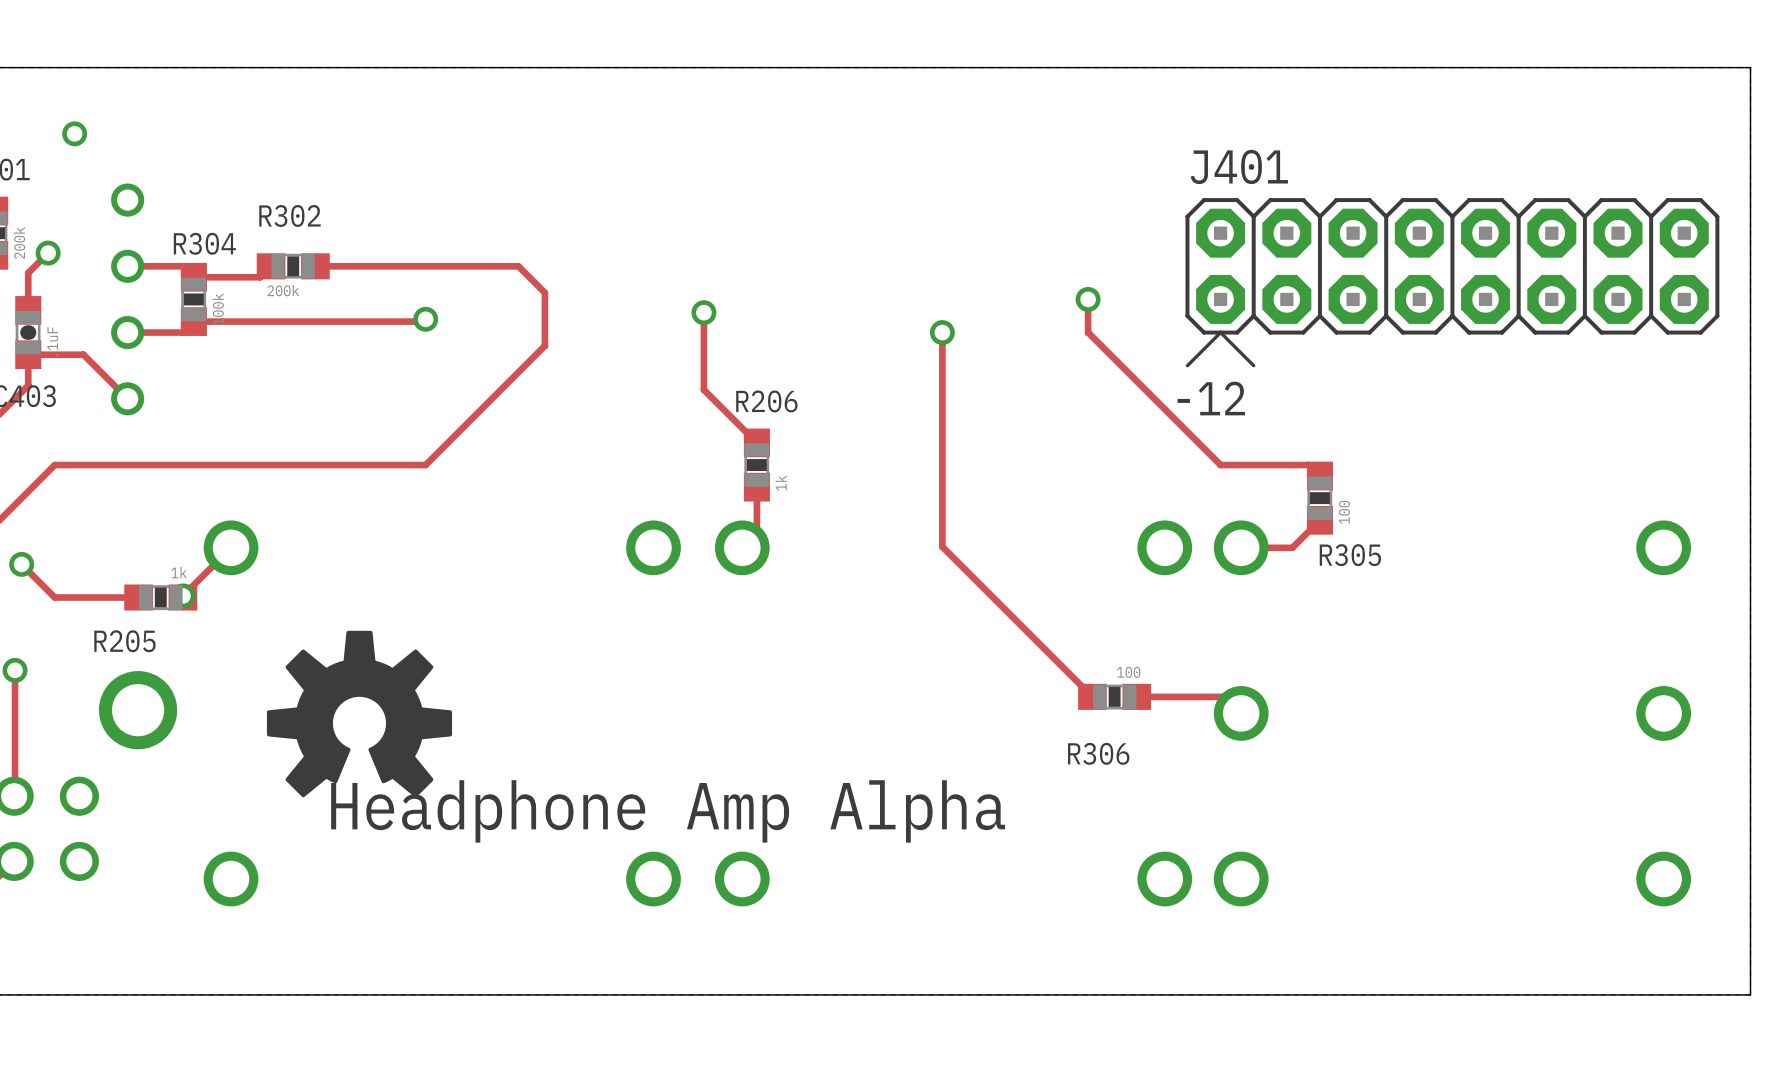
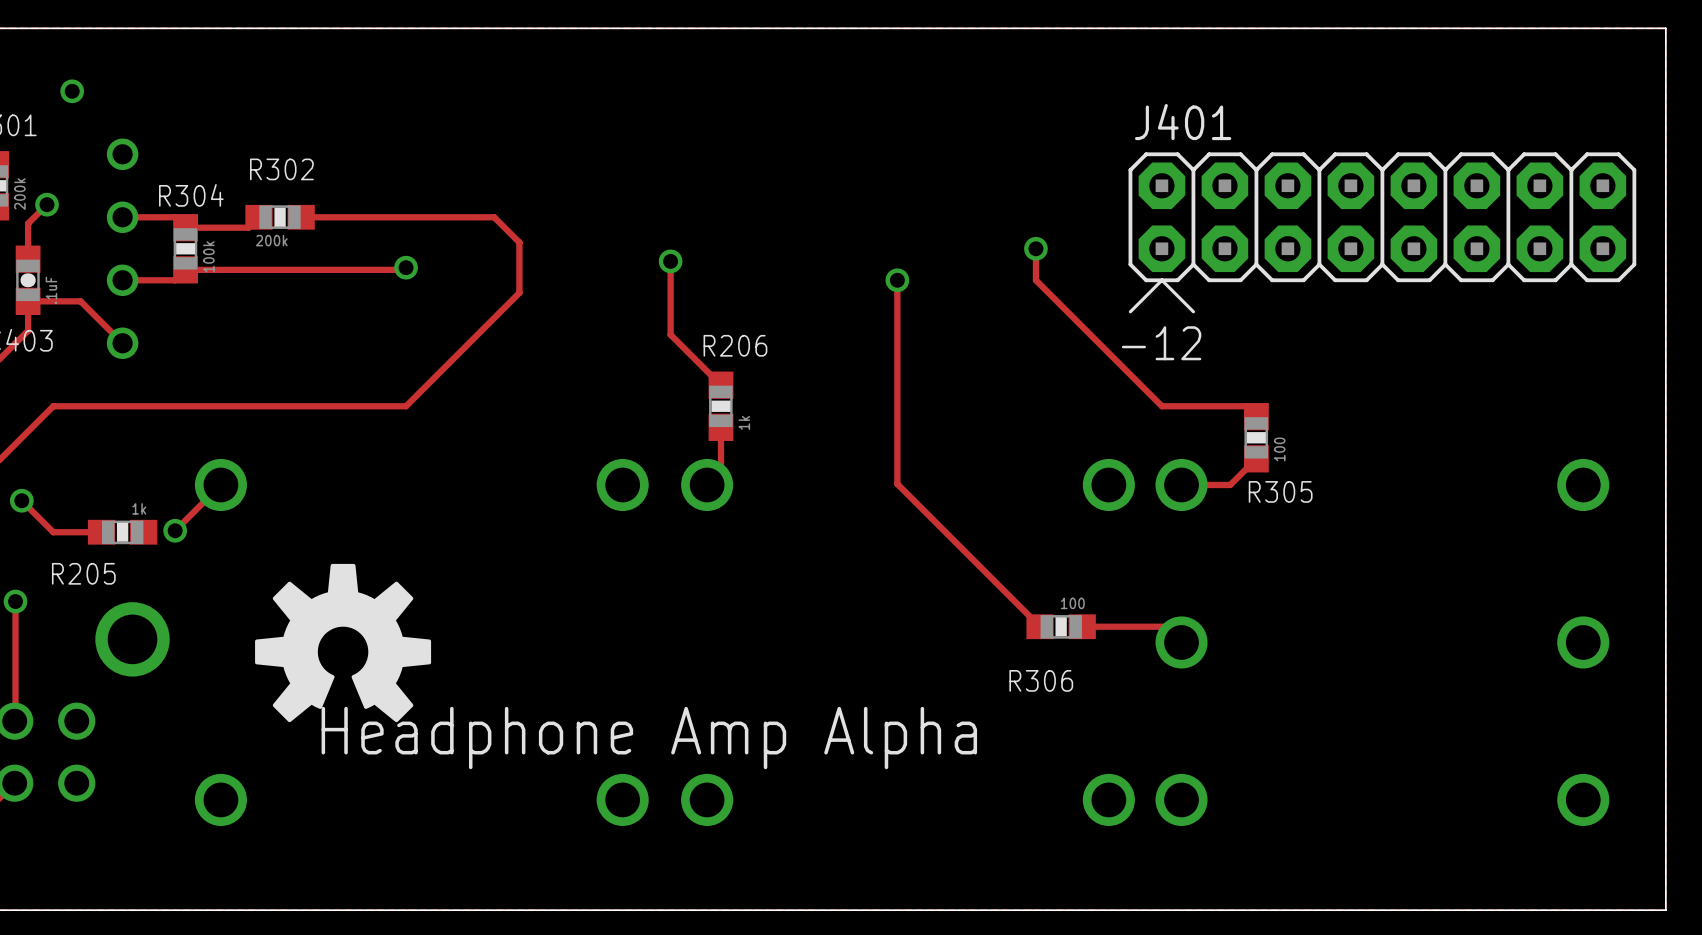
track: (105, 597) (138, 597) -> none
R205 position: (160, 597) -> (122, 532)

